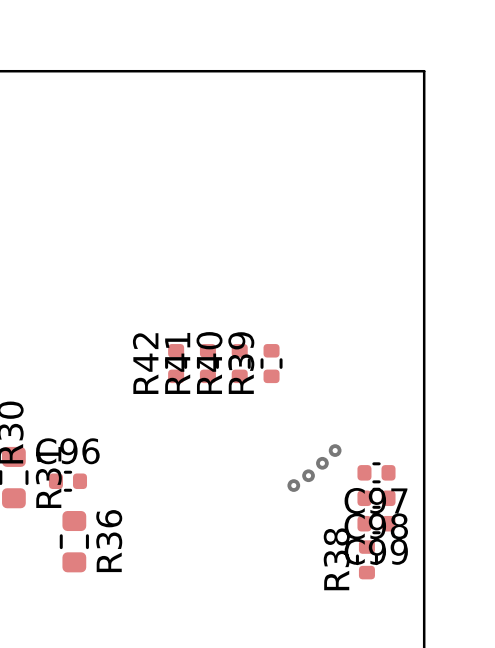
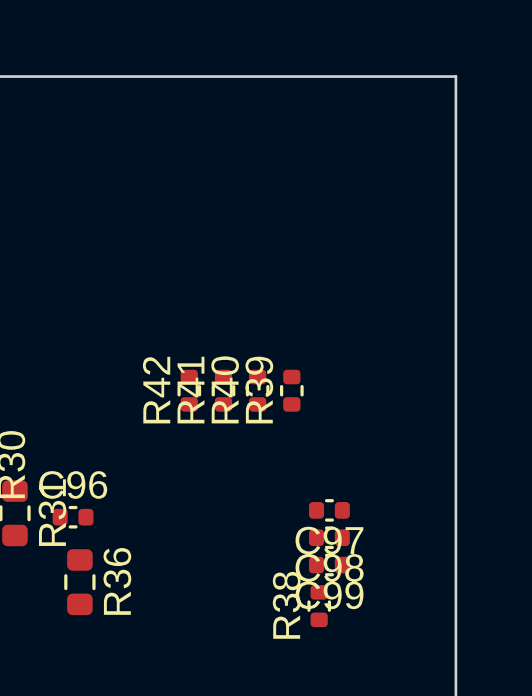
via: (335, 450) -> none
via: (322, 463) -> none
C97 position: (376, 472) -> (329, 510)
via: (308, 475) -> none
via: (293, 485) -> none
C98 position: (376, 498) -> (329, 537)
C99 position: (376, 523) -> (329, 565)
R38 position: (366, 559) -> (319, 606)

